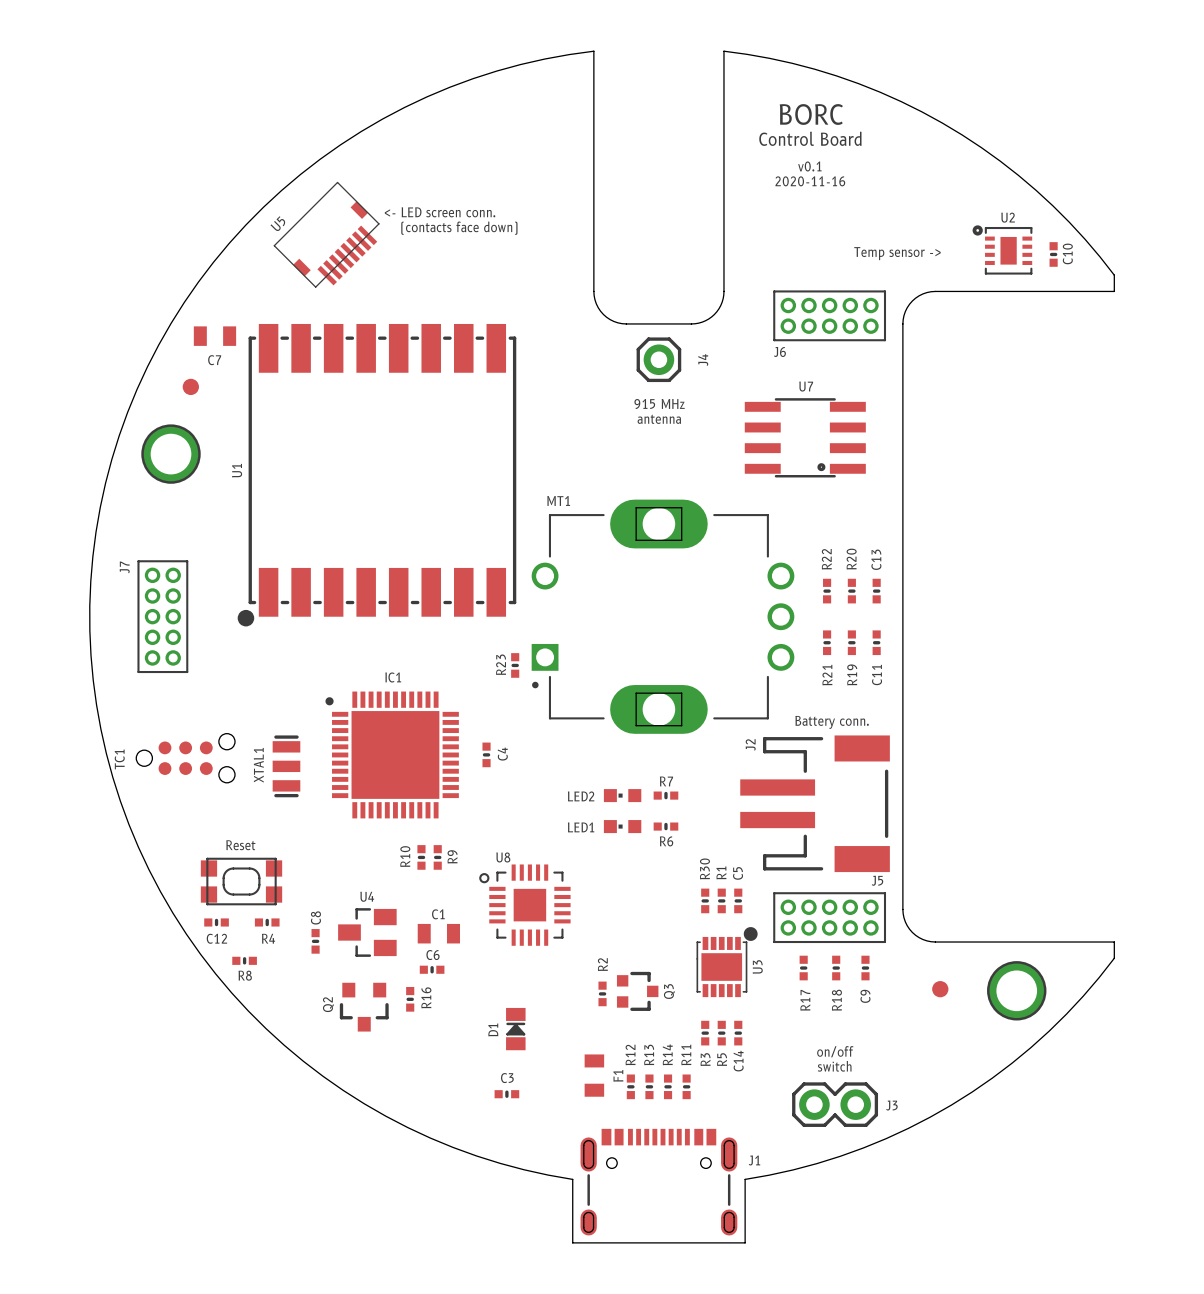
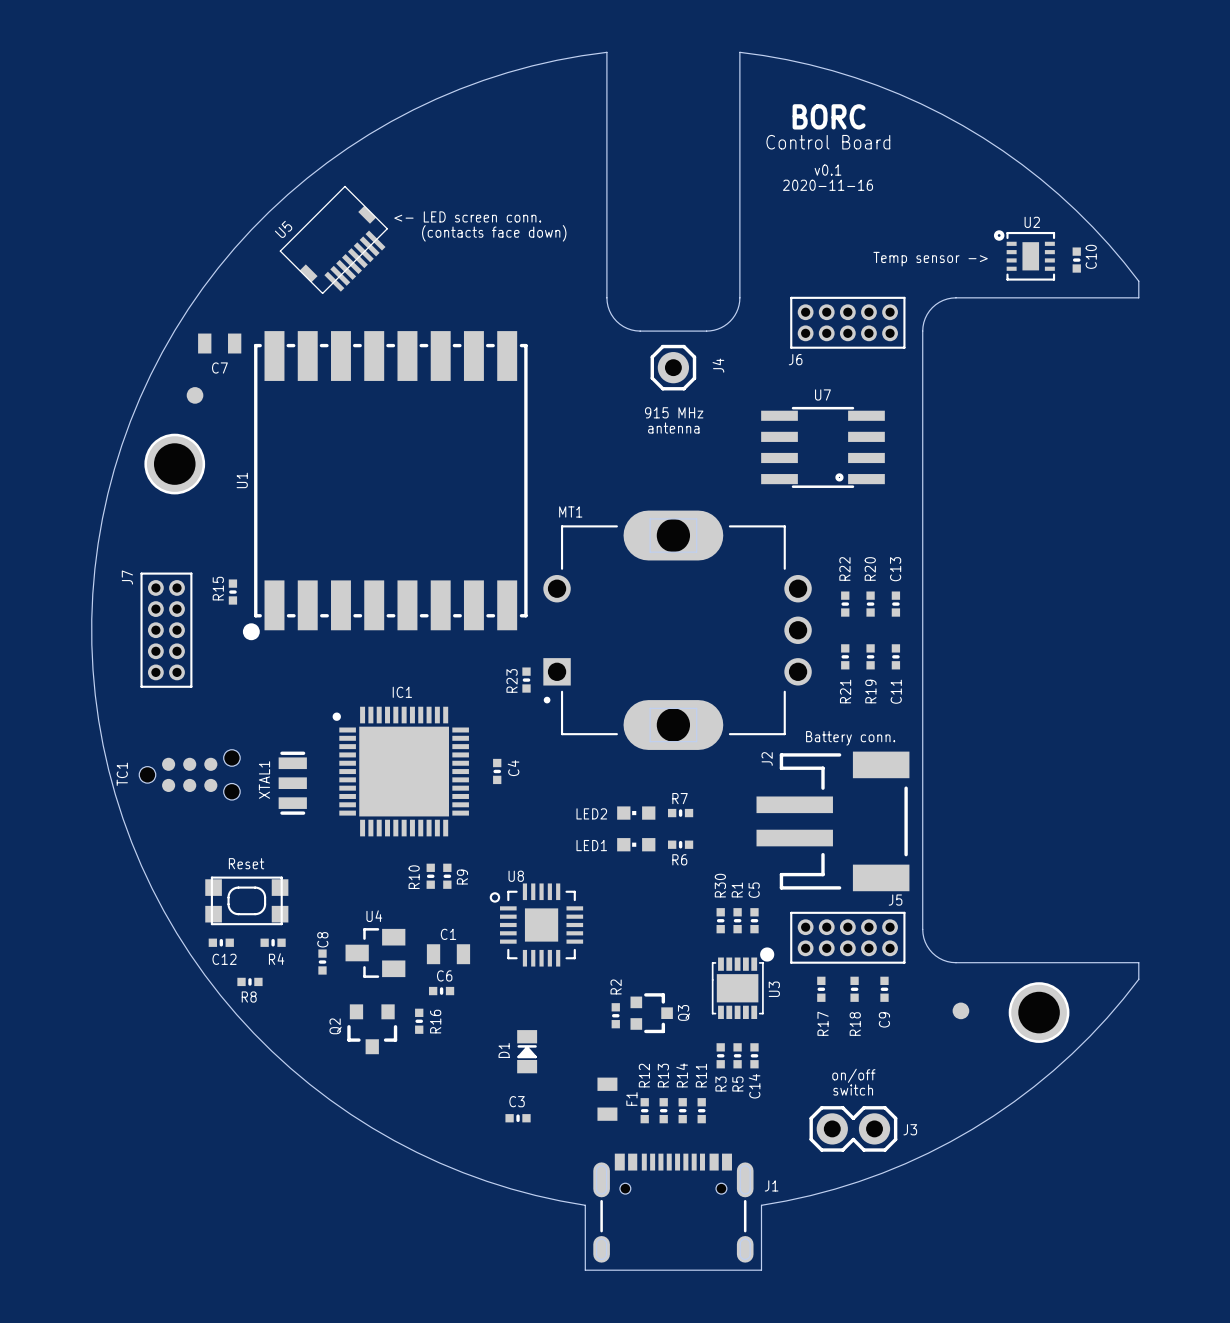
R15: none -> (232, 592)

